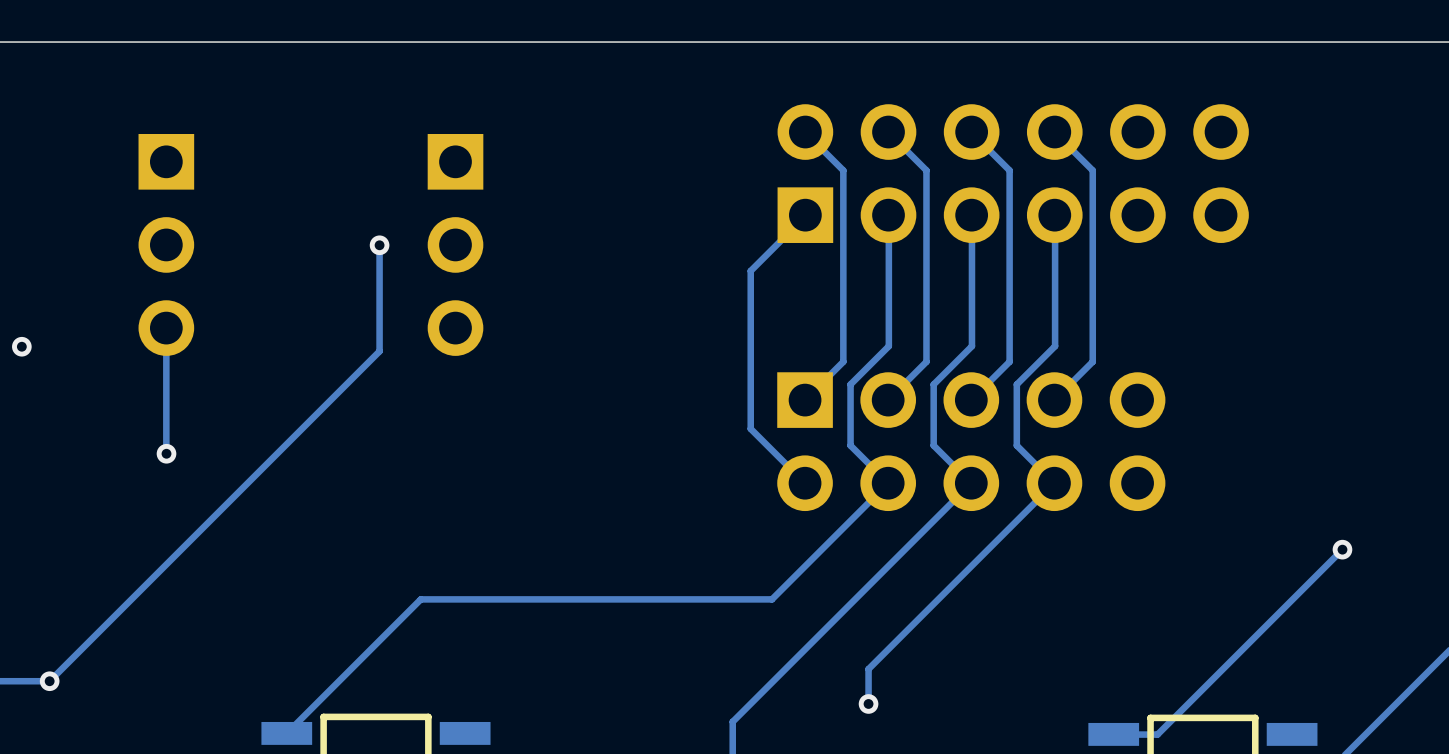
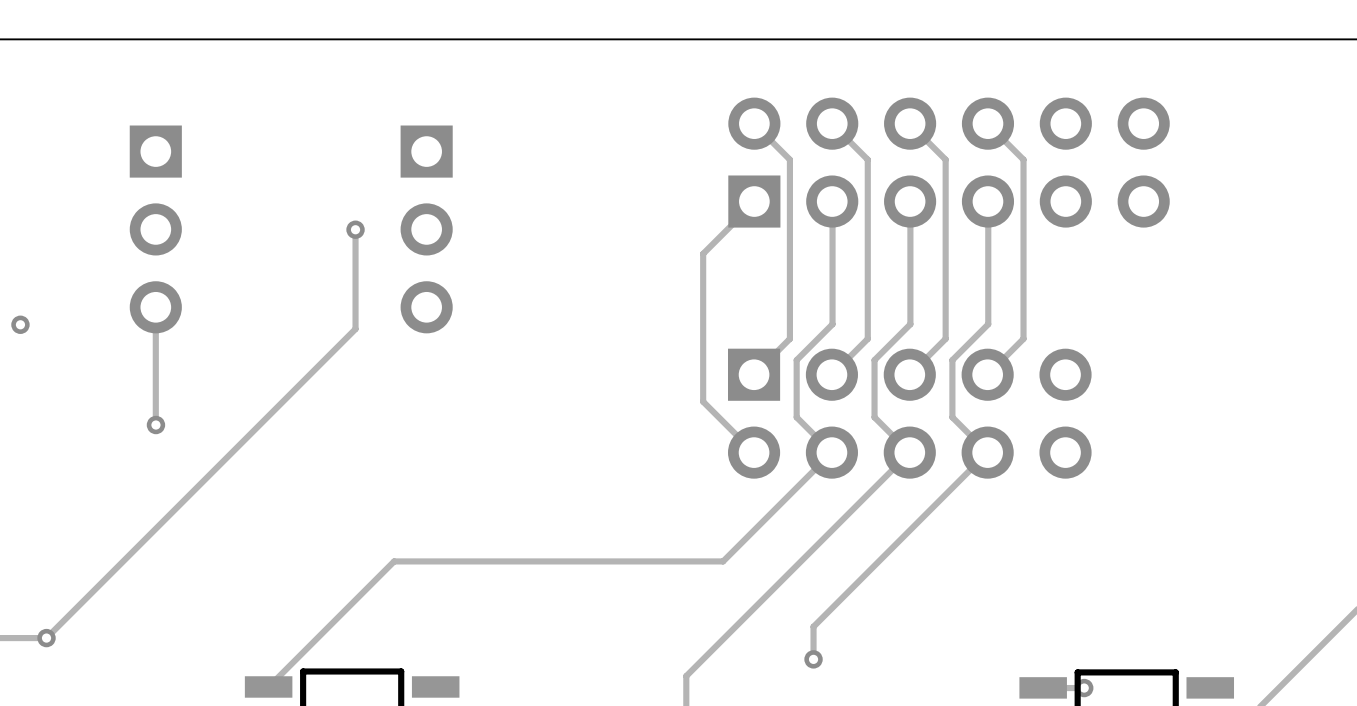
track: (1342, 549) (1157, 734) -> none
via: (1342, 549) -> none
via: none -> (1084, 688)

